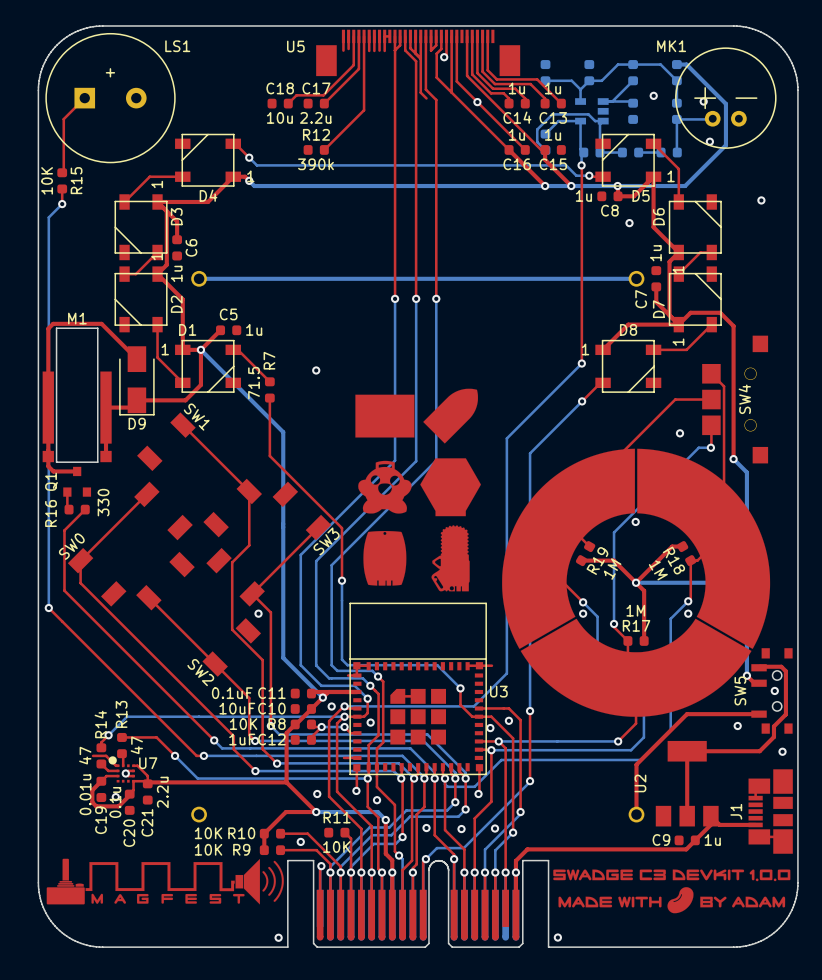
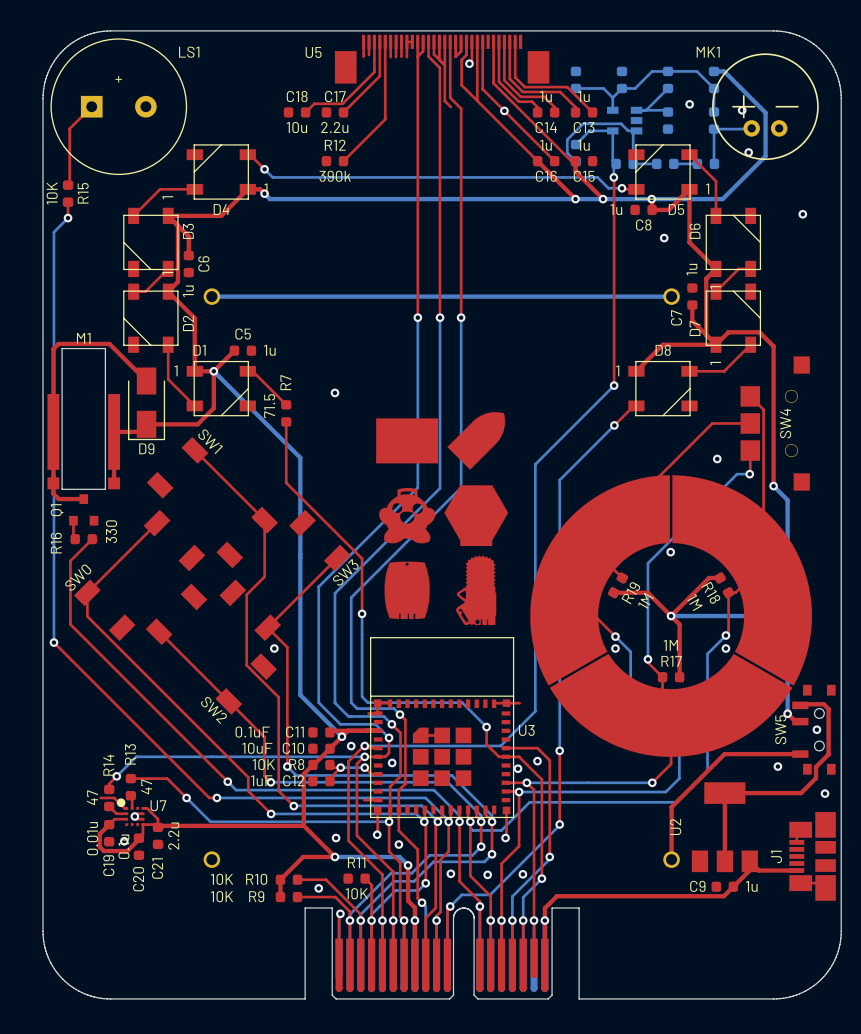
drawing: [46, 858, 284, 905] -> none
drawing: [553, 869, 791, 914] -> none
via: (278, 937) -> none
via: (557, 937) -> none

